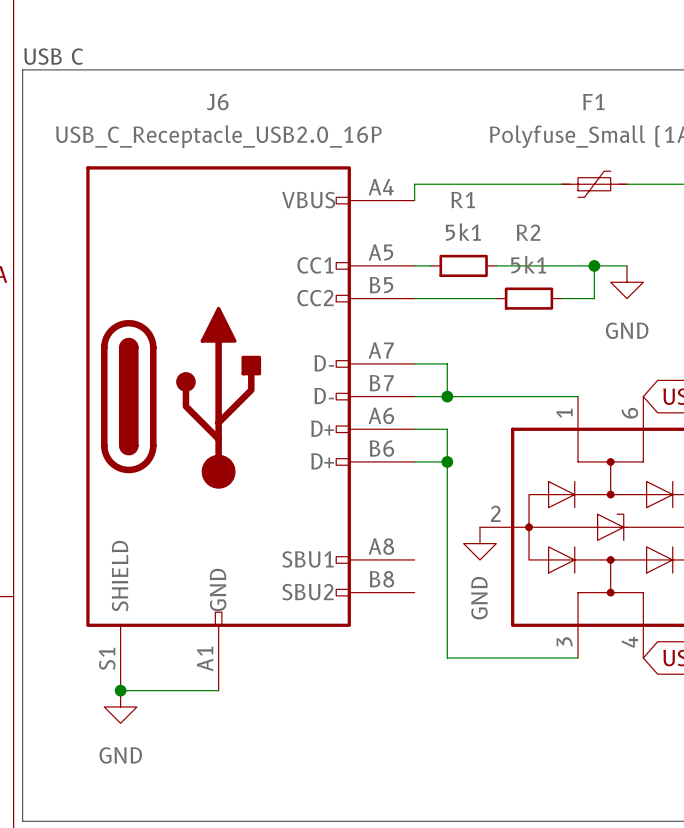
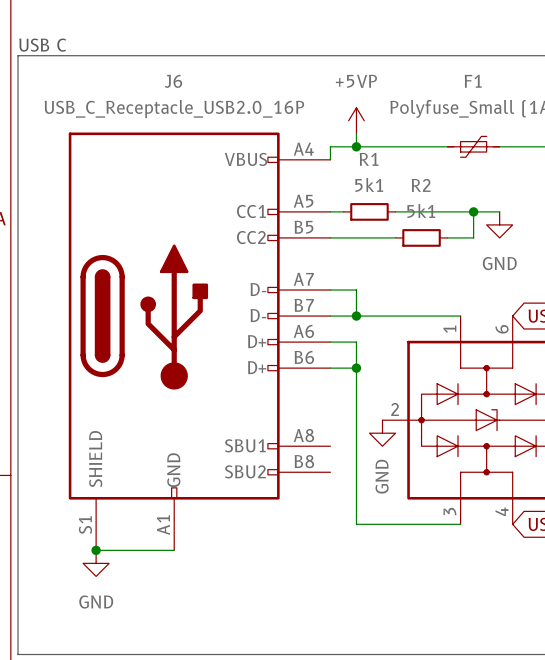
power symbol: none -> +5VP (356, 120)
wire: none -> (356, 133) (356, 146)
junction: none -> (356, 146)

